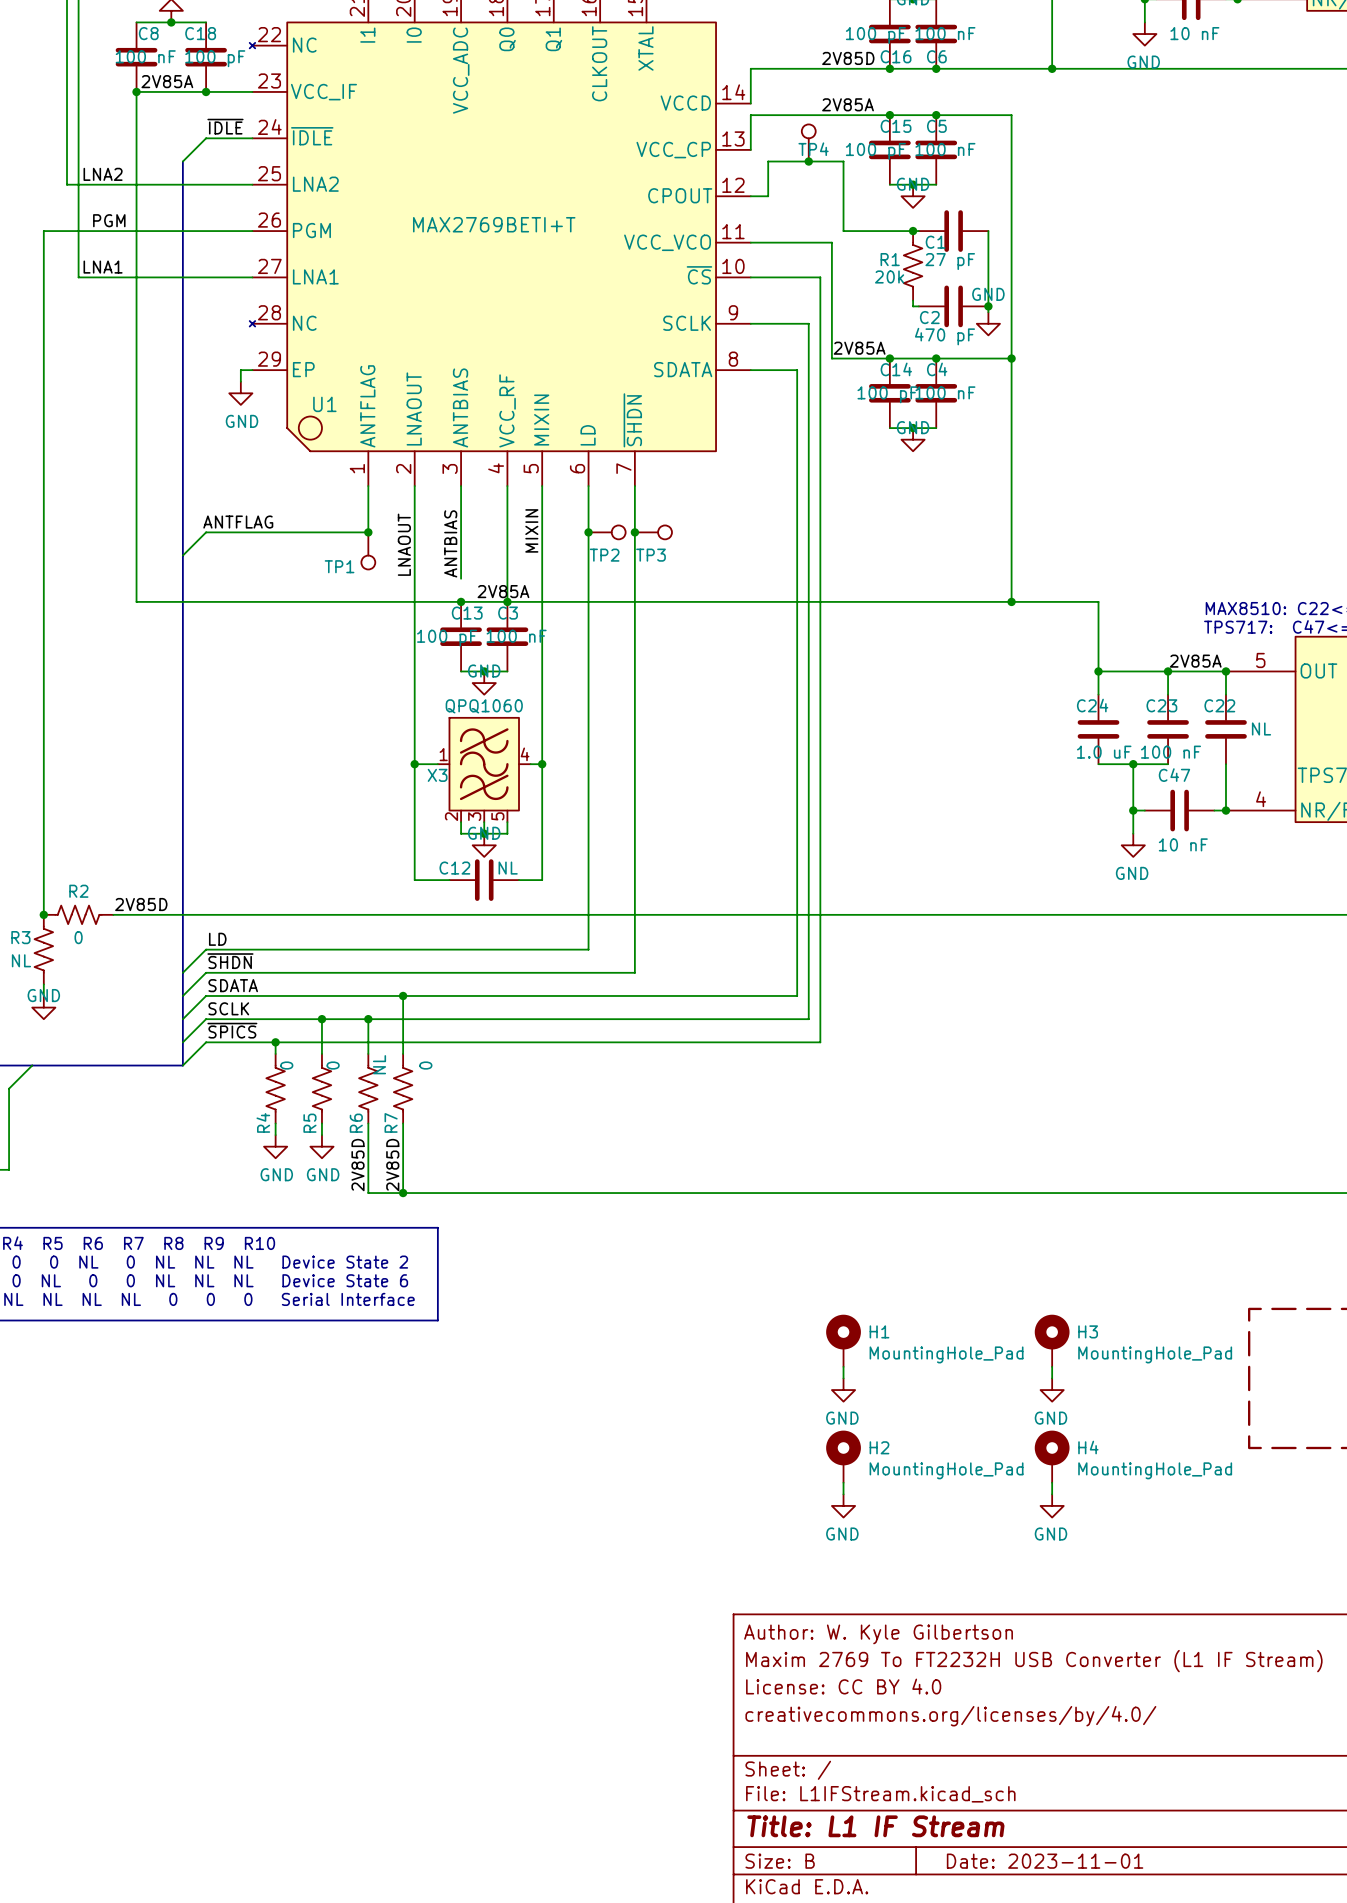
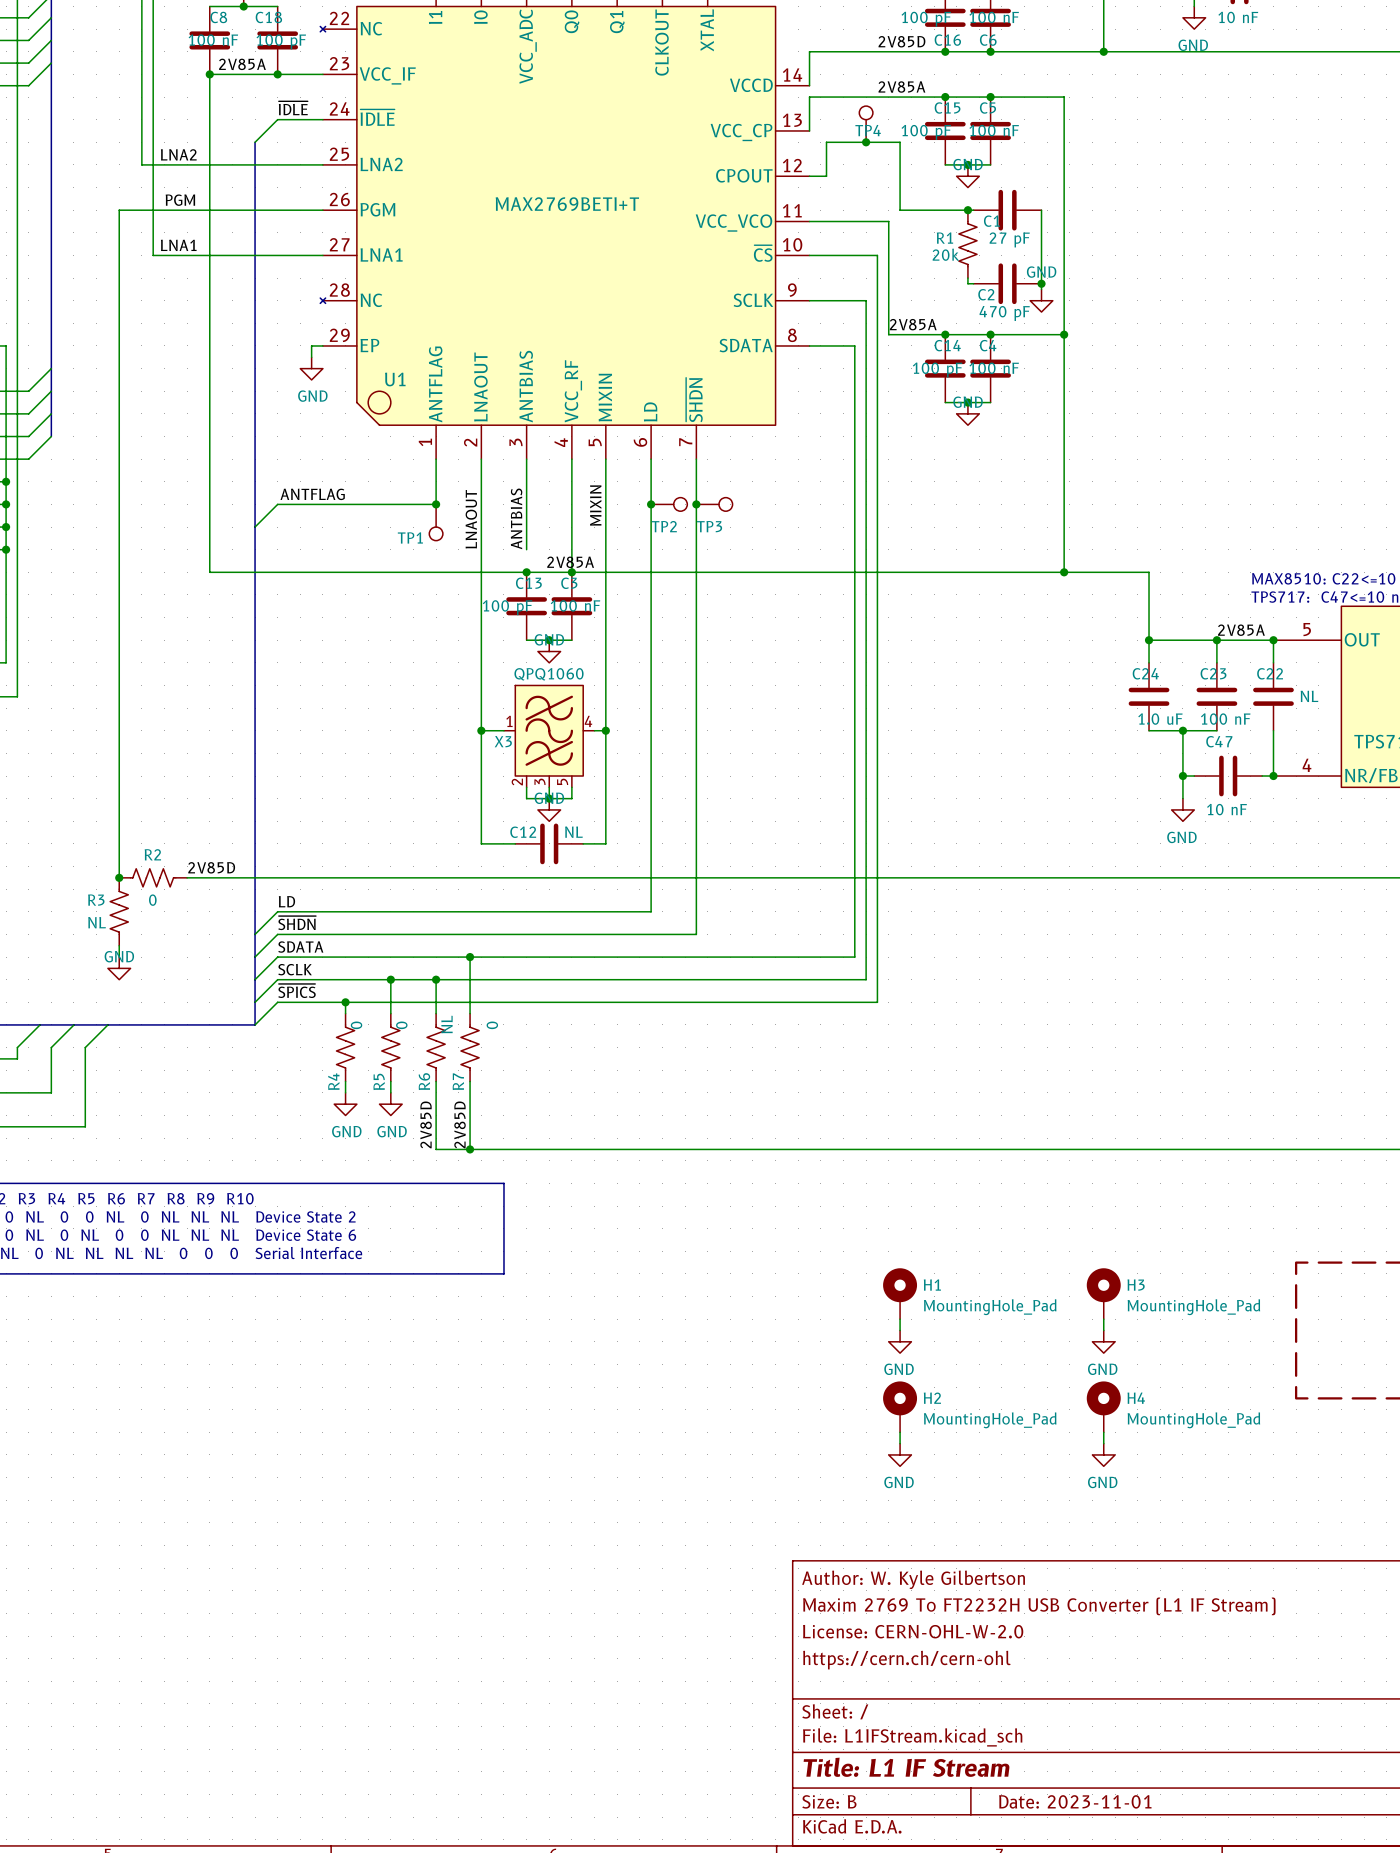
title block: License: CC BY 4.0 (843, 1686) -> License: CERN-OHL-W-2.0 (913, 1631)
title block: creativecommons.org/licenses/by/4.0/ (950, 1716) -> https://cern.ch/cern-ohl (906, 1660)

